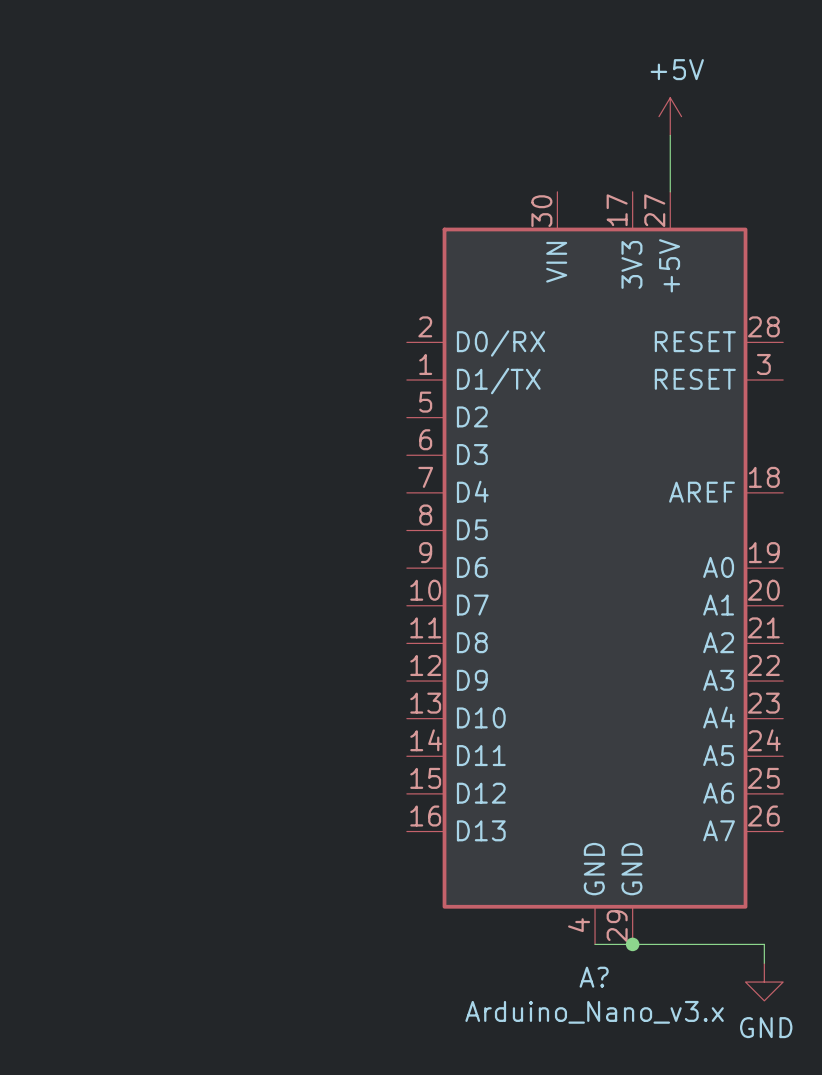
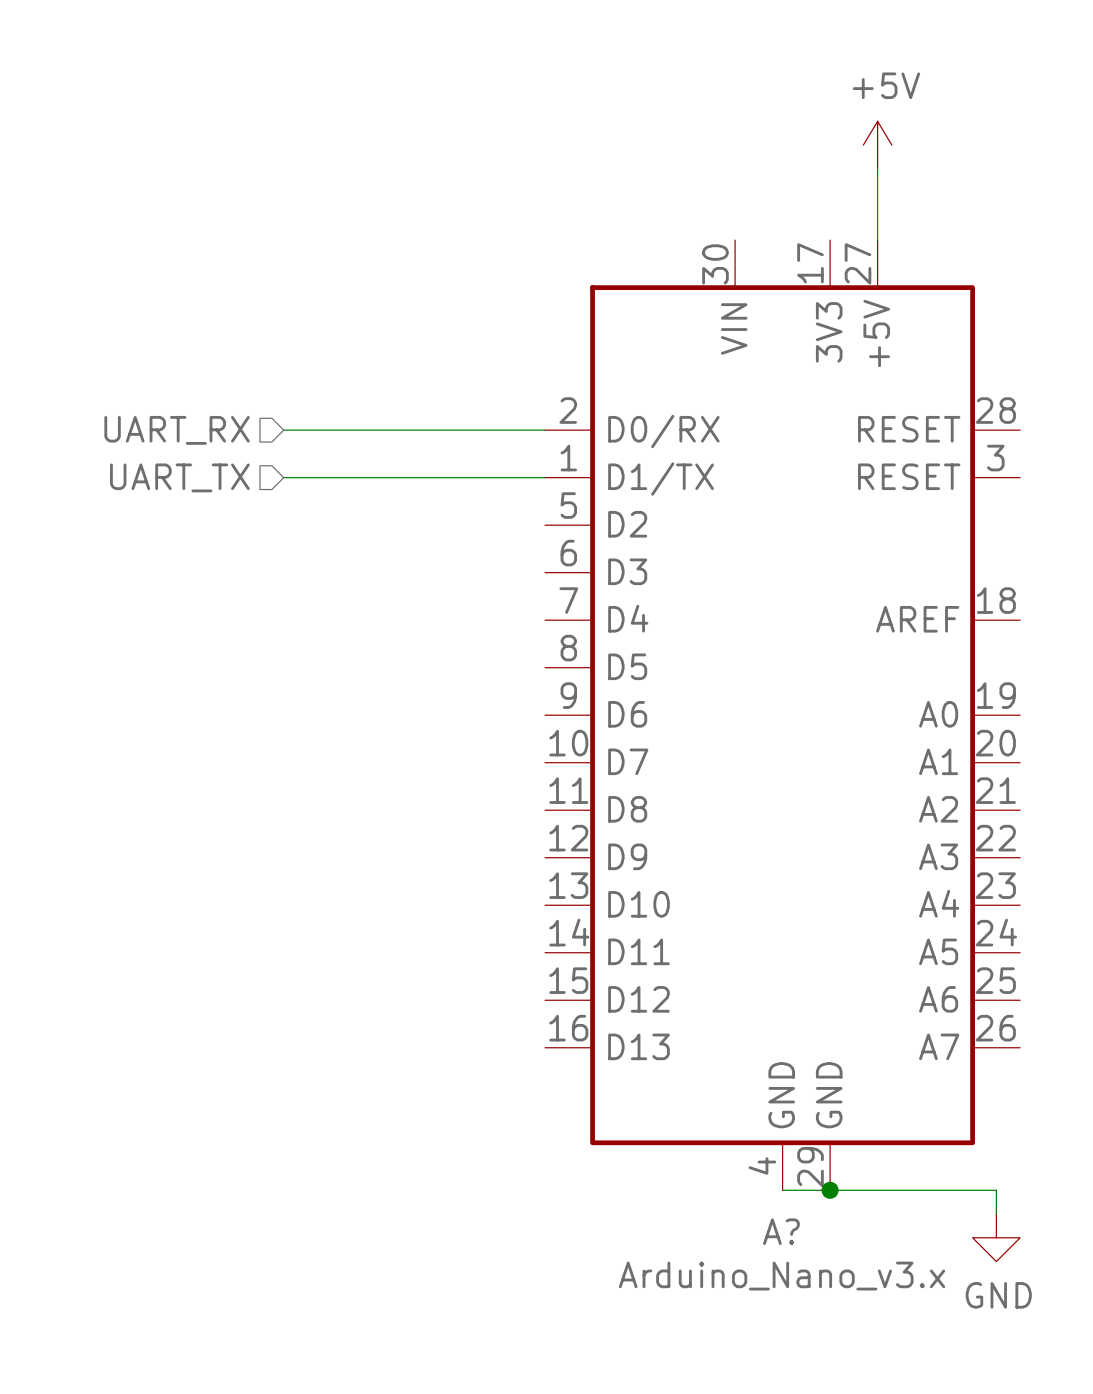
hierarchical label: none -> UART_RX (177, 430)
wire: none -> (283, 430) (545, 430)
hierarchical label: none -> UART_TX (179, 477)
wire: none -> (283, 477) (545, 477)

